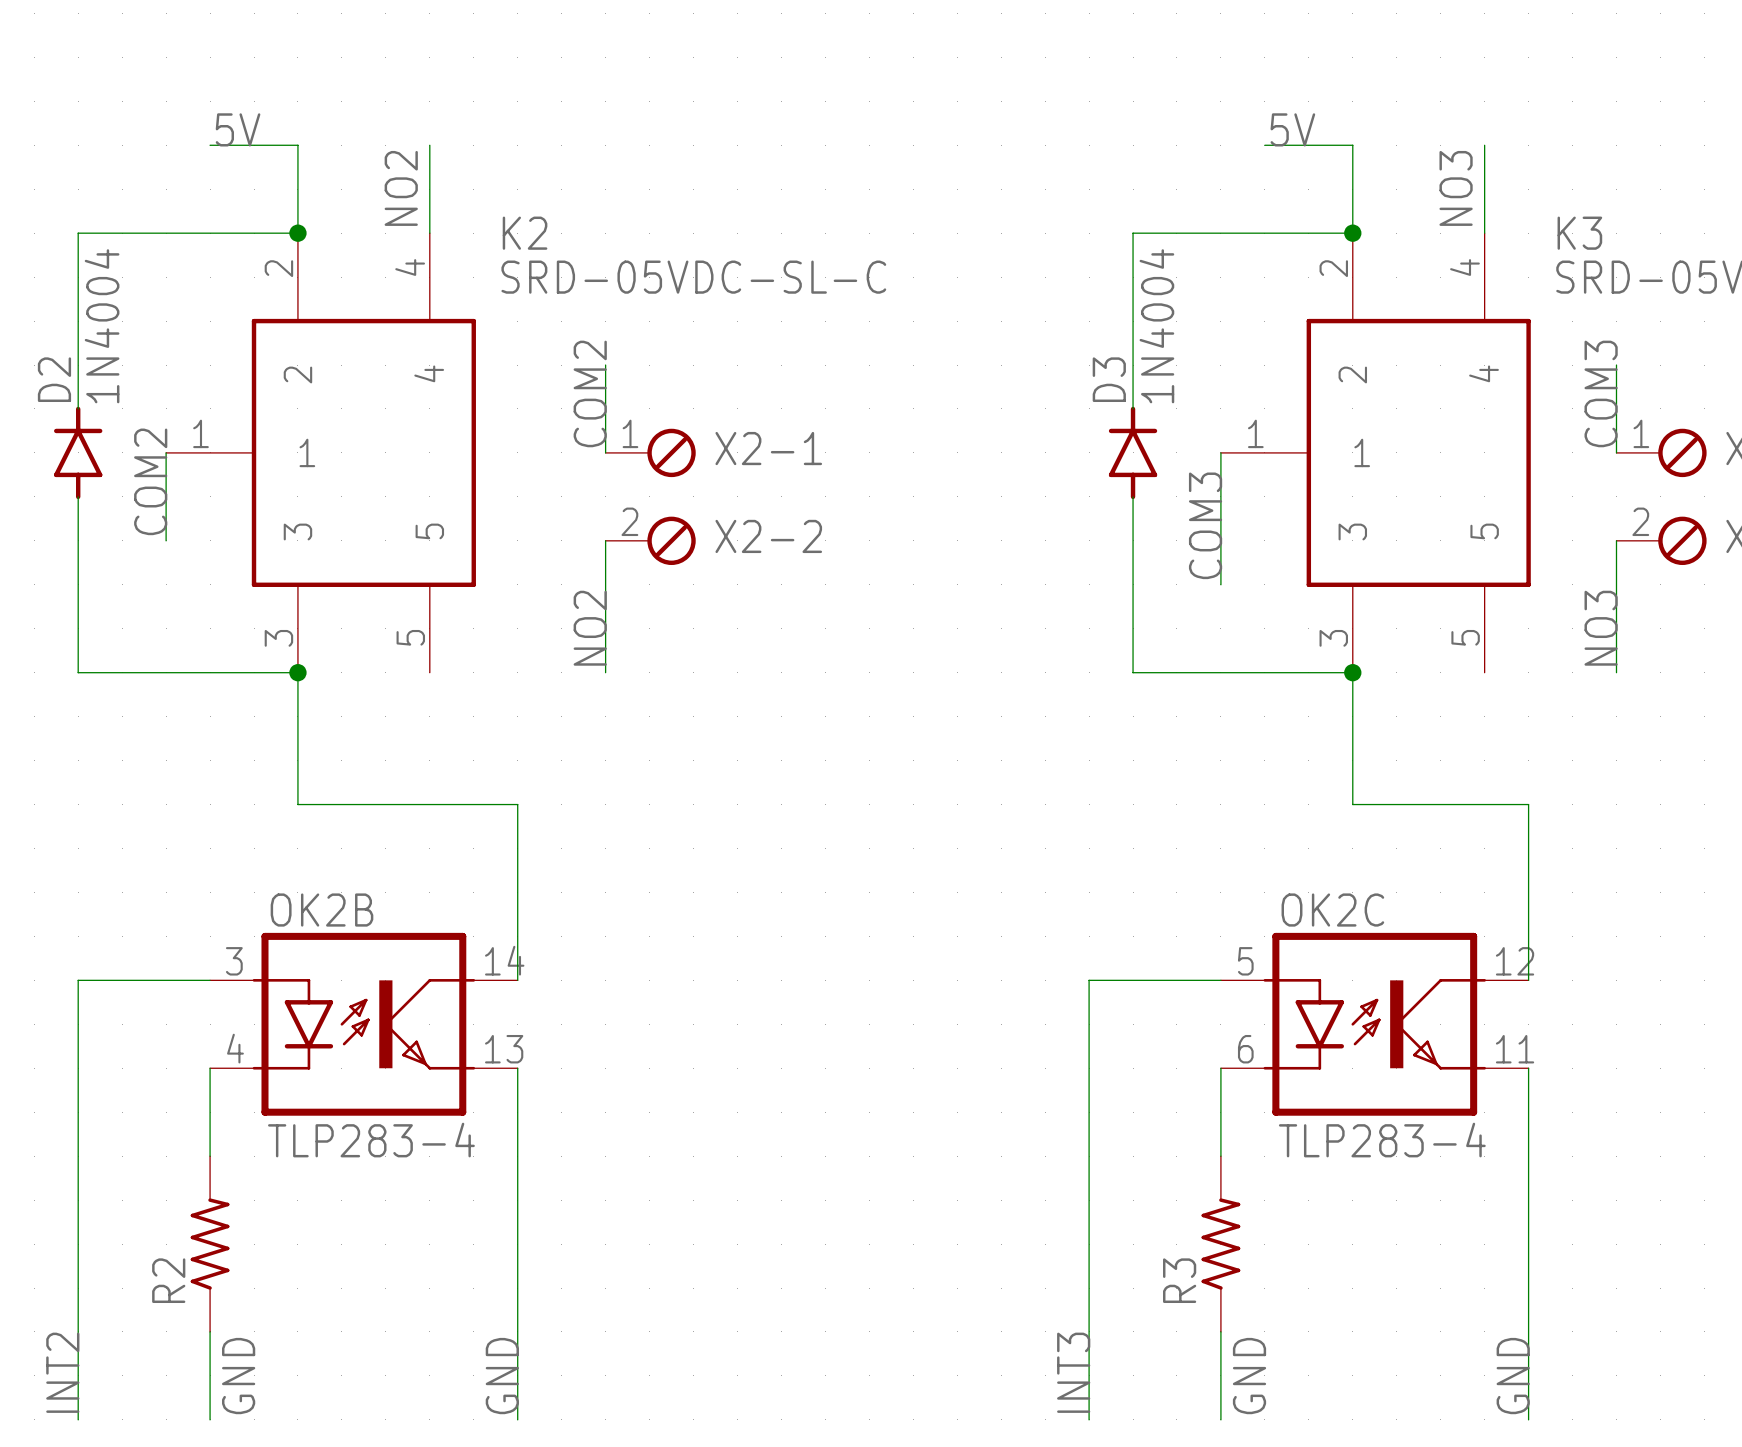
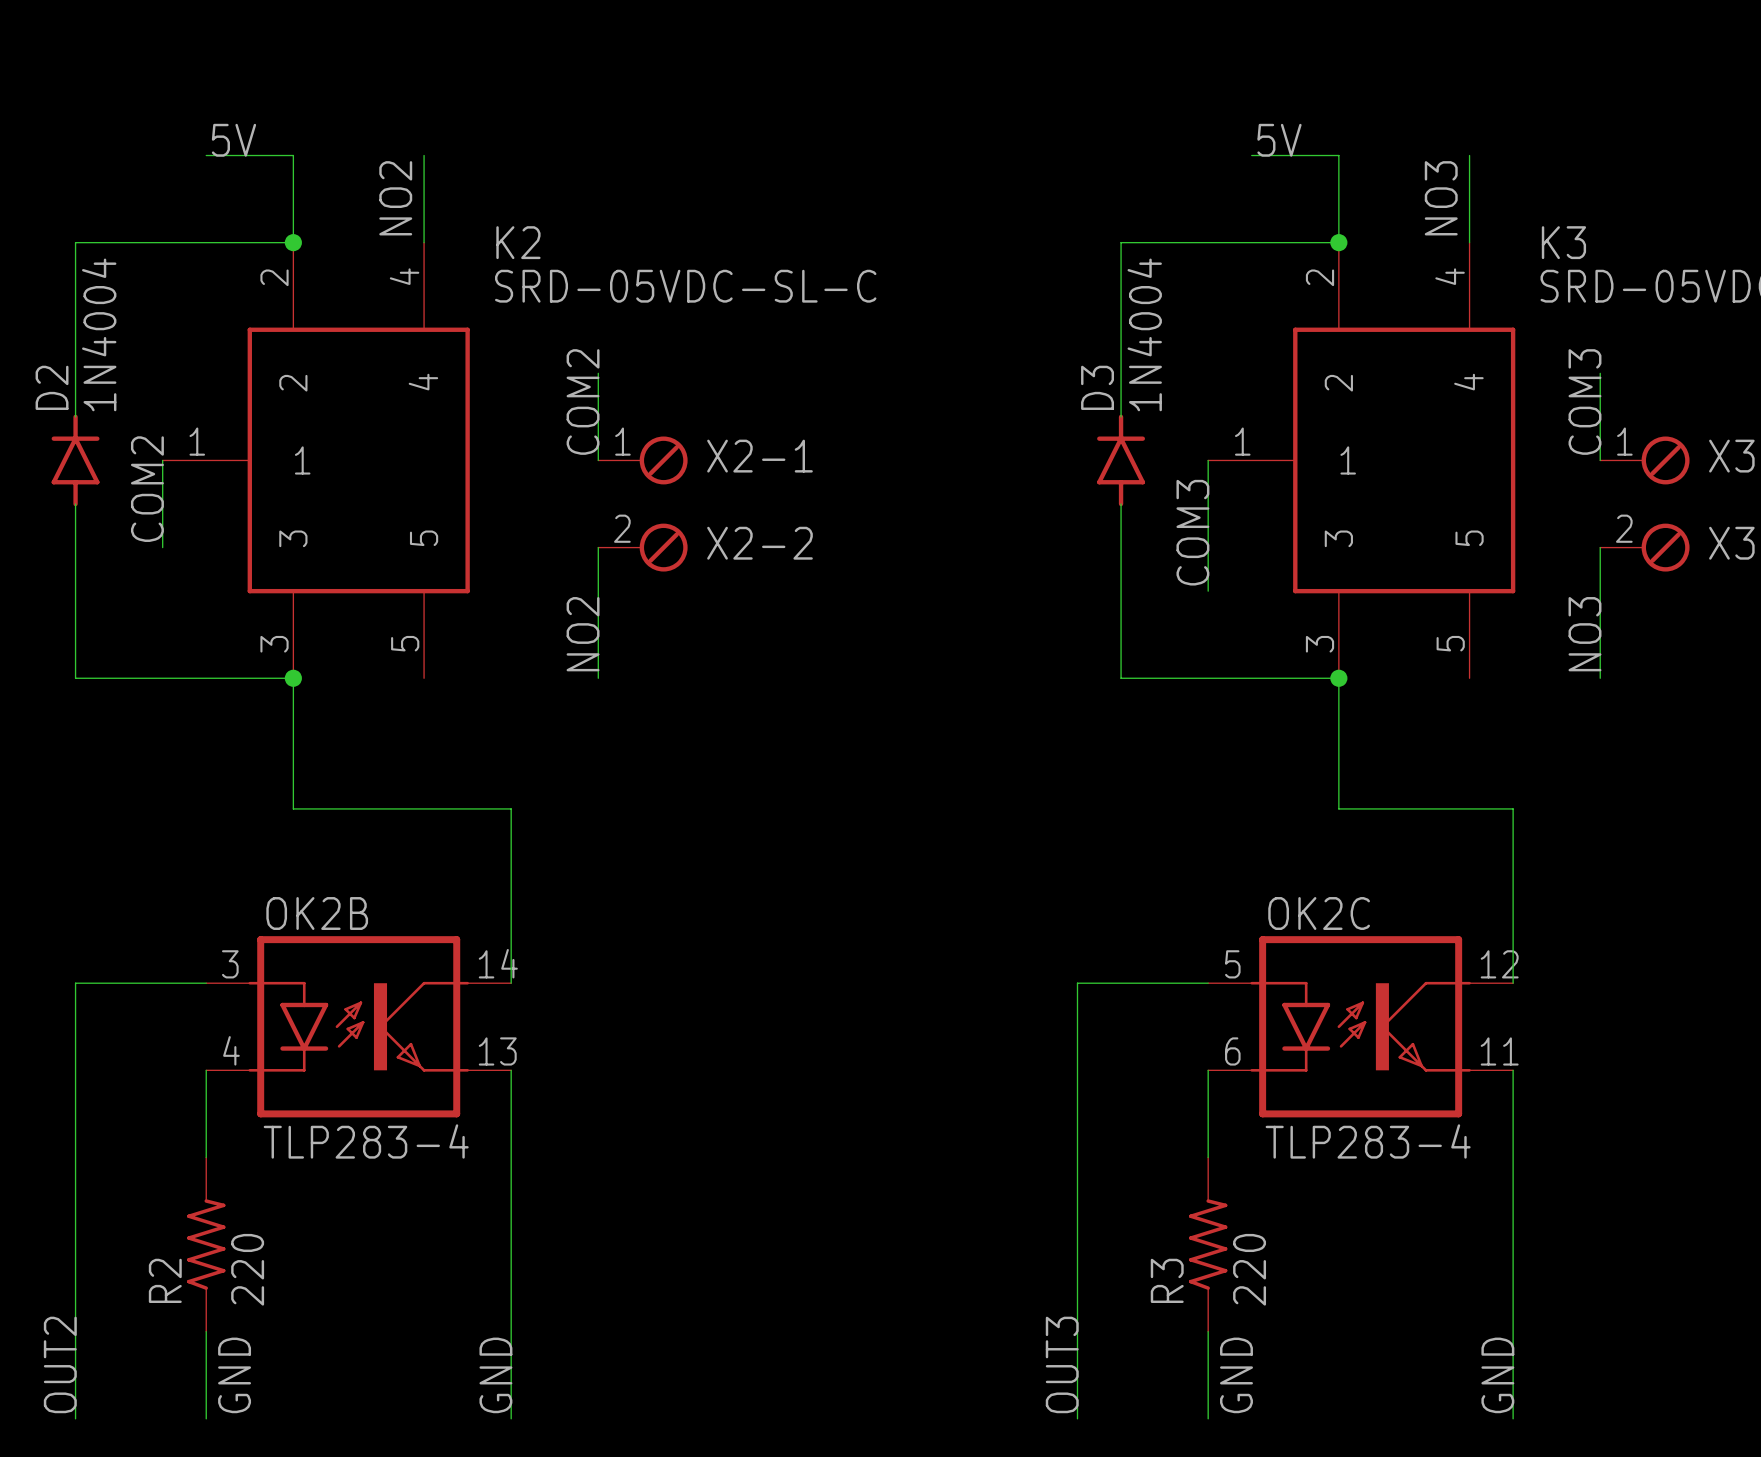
R2 value: none -> 220 (247, 1269)
R3 value: none -> 220 (1249, 1269)
label: INT2 (62, 1372) -> OUT2 (60, 1364)
label: INT3 (1073, 1372) -> OUT3 (1062, 1364)

